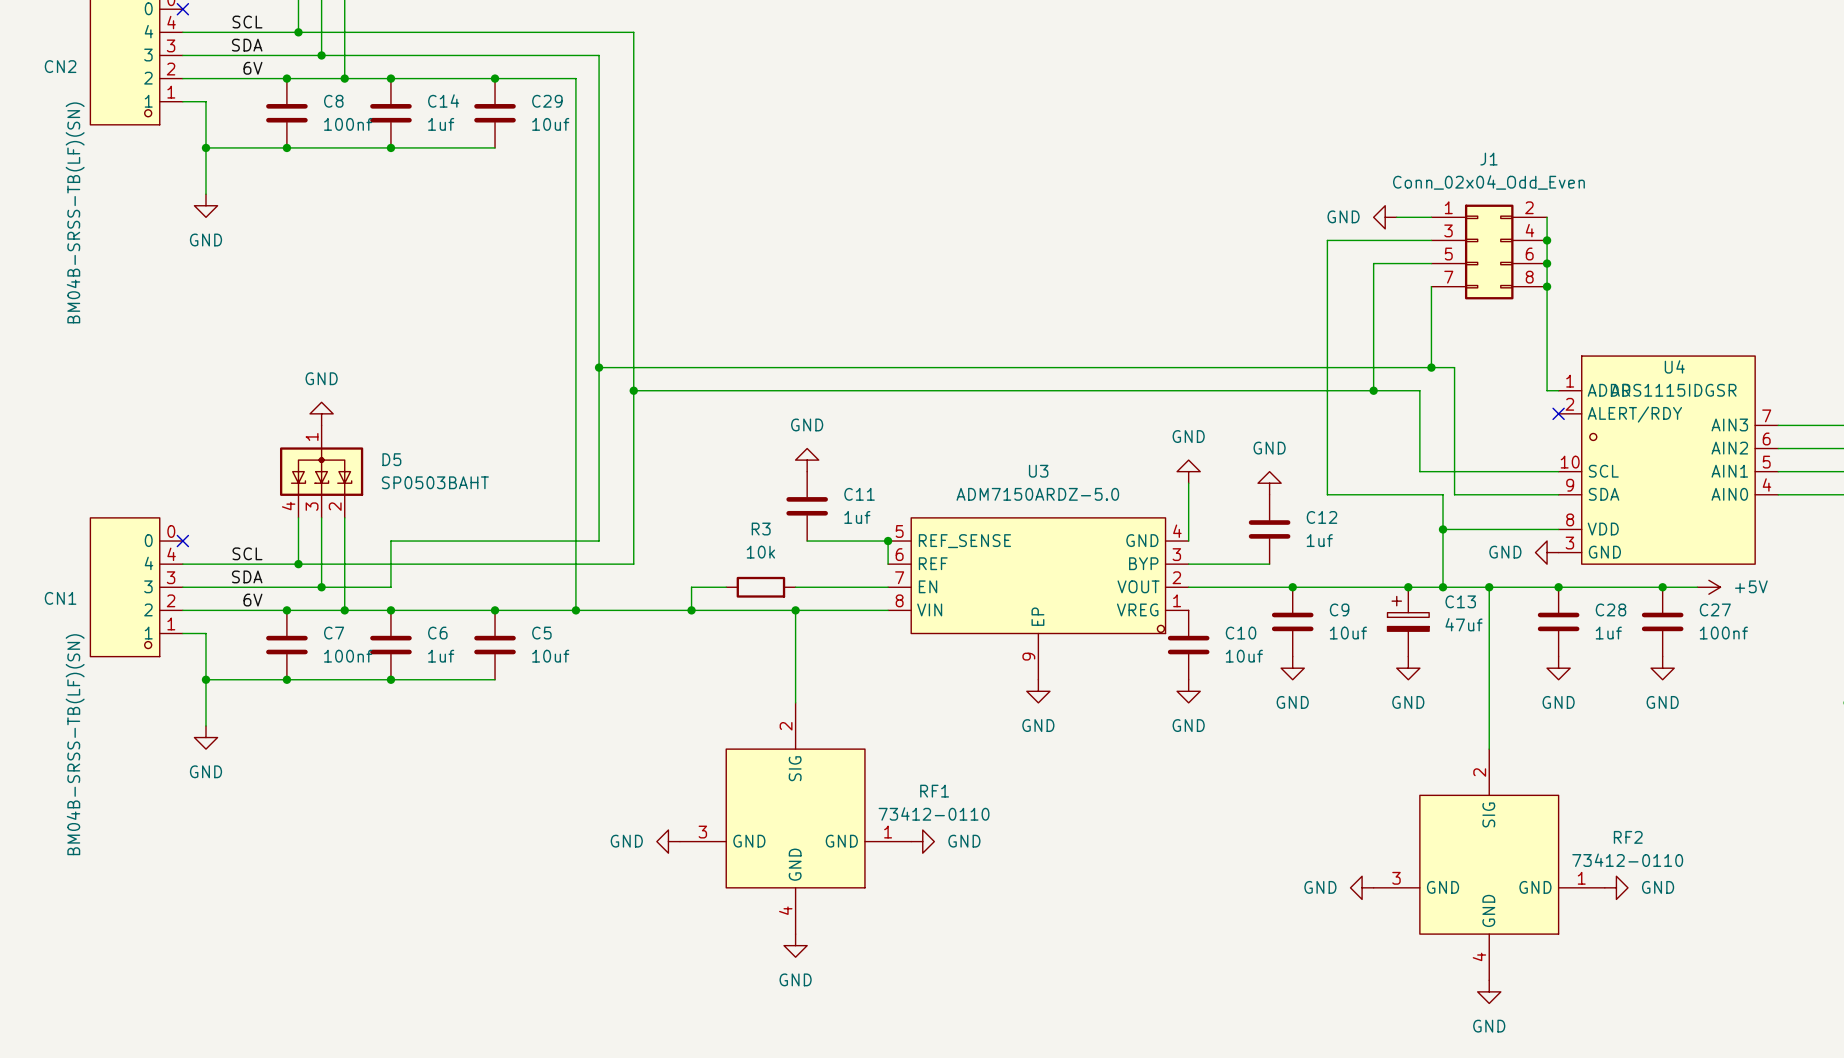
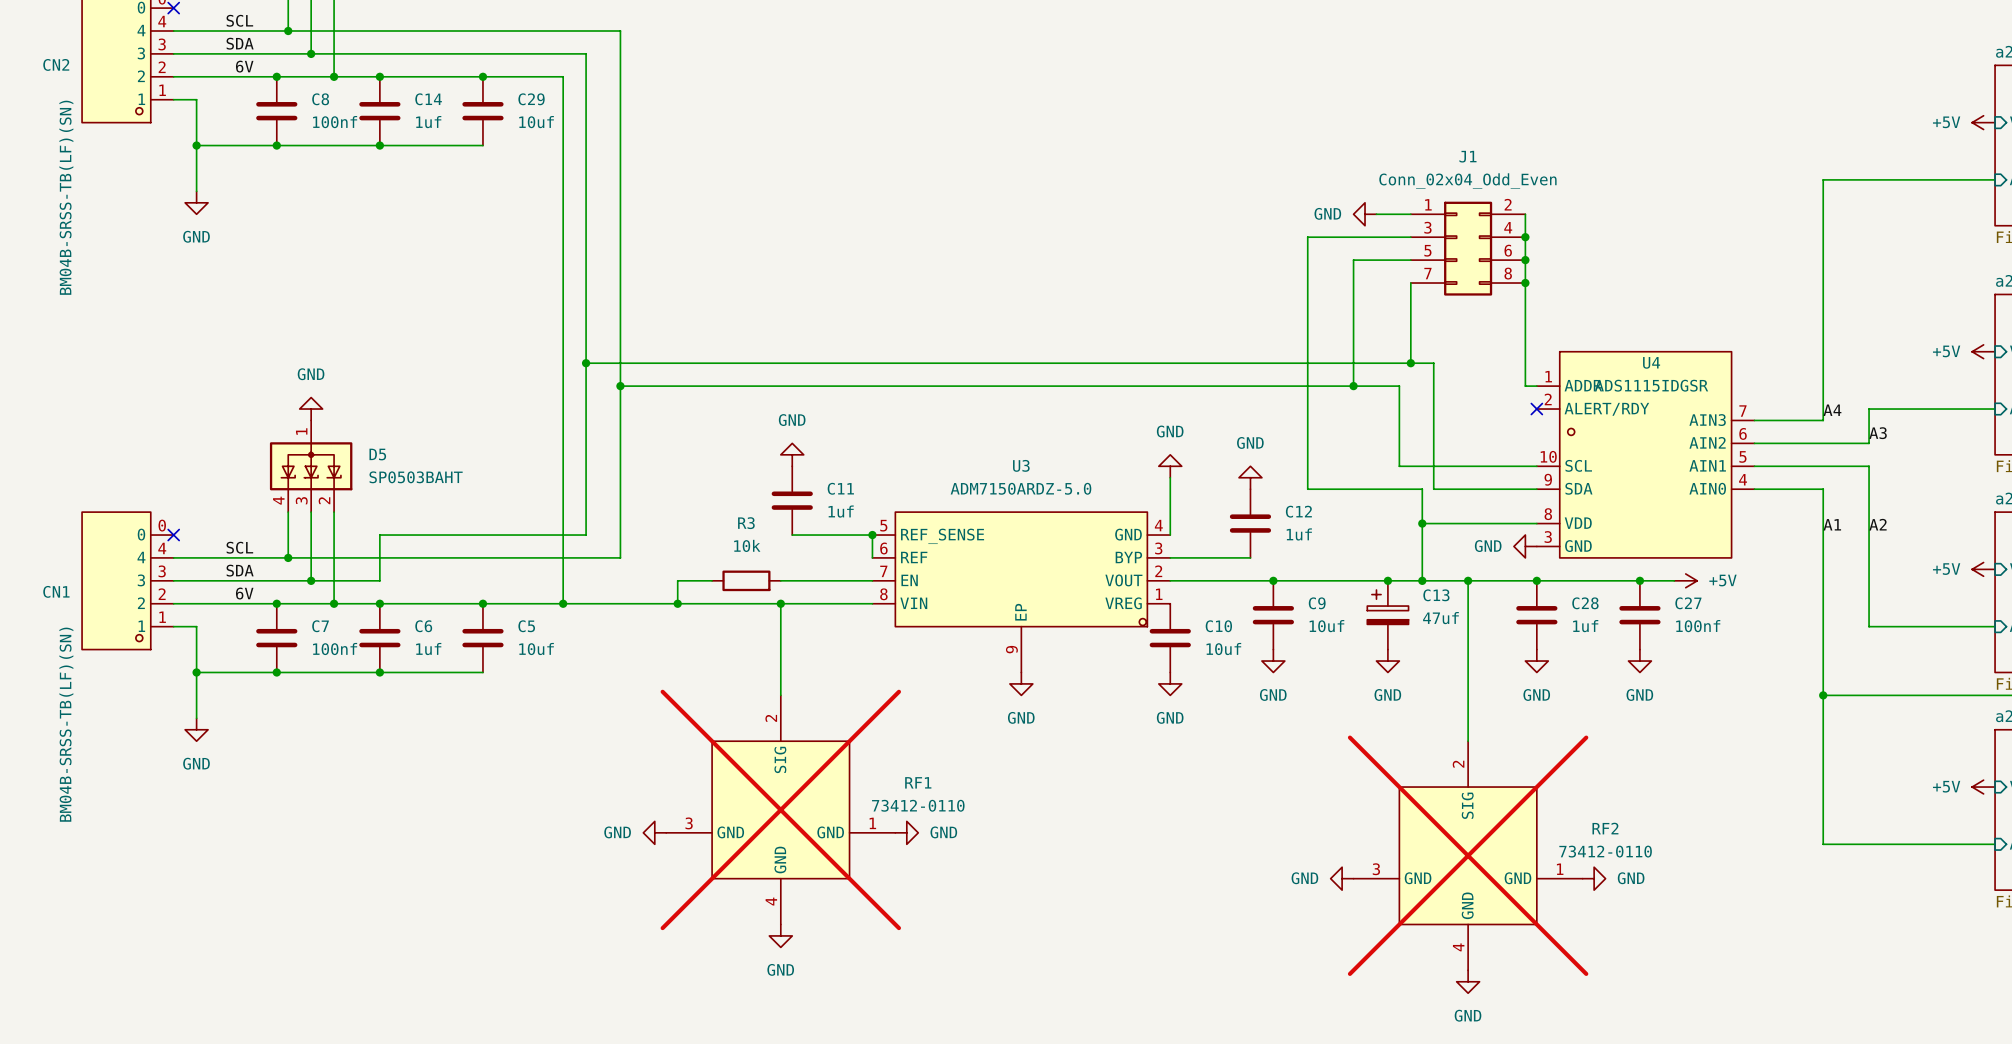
RF1 do-not-place cross: none -> (780, 809)
RF2 do-not-place cross: none -> (1468, 855)

